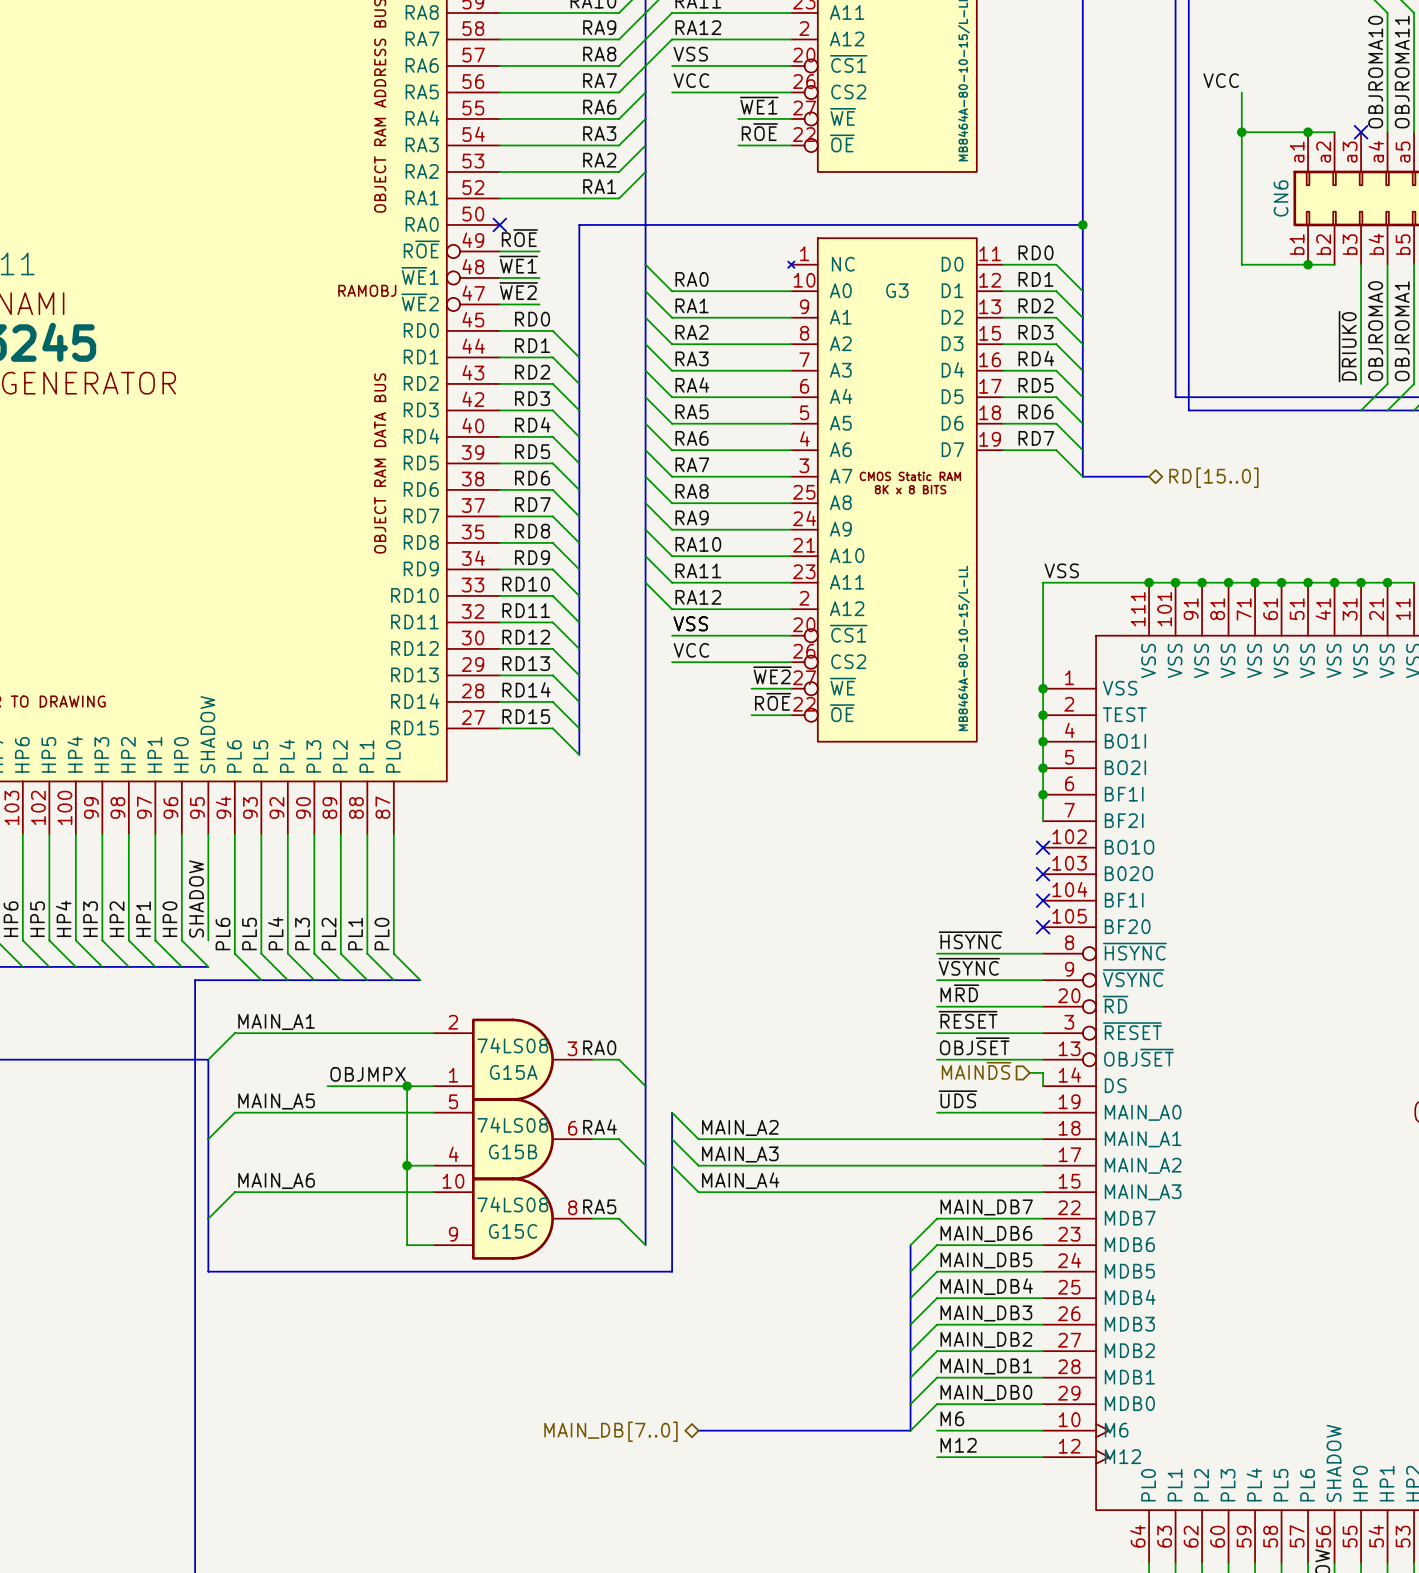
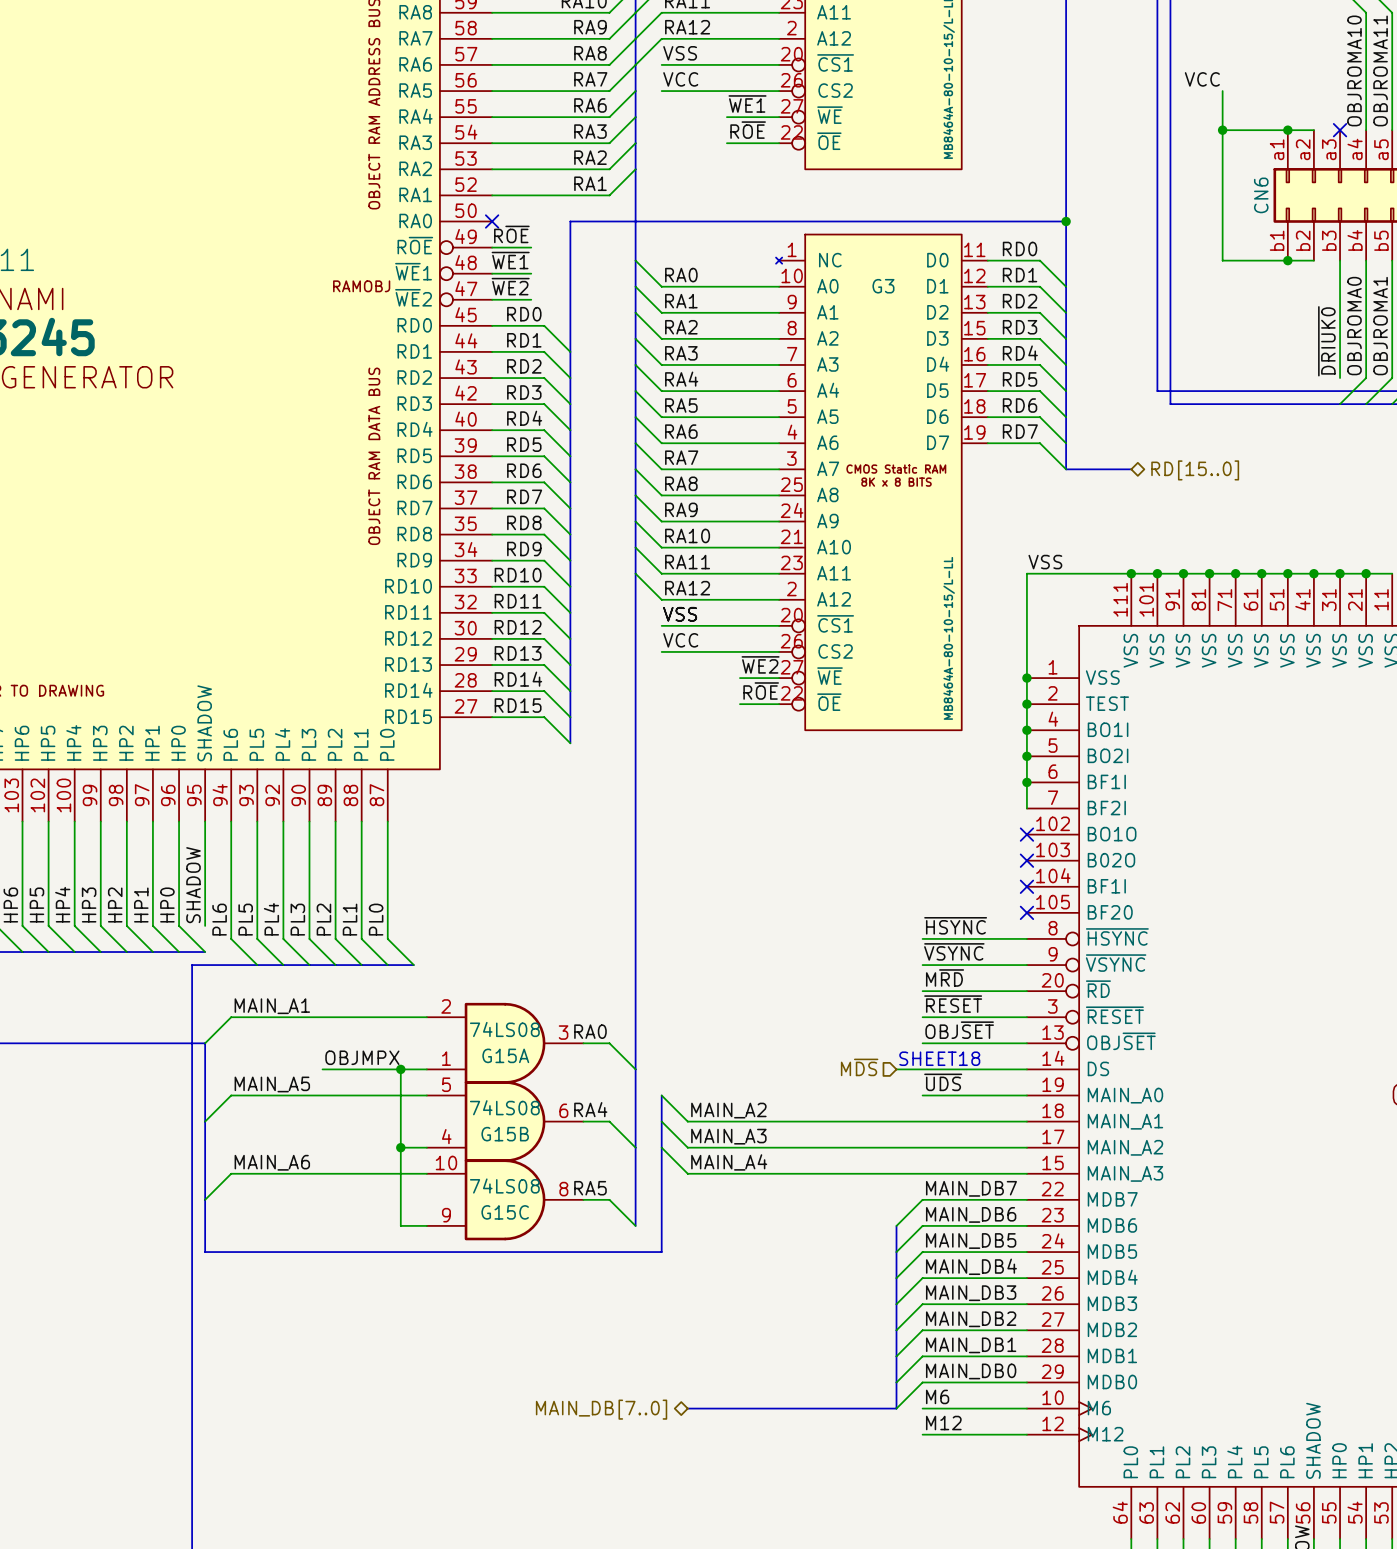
hierarchical label: MAIN~{DS} (976, 1070) -> M~{DS} (859, 1067)
wire: (1029, 1072) (1043, 1072) (1043, 1086) -> (896, 1069) (1026, 1069)
text: none -> SHEET18 (939, 1058)

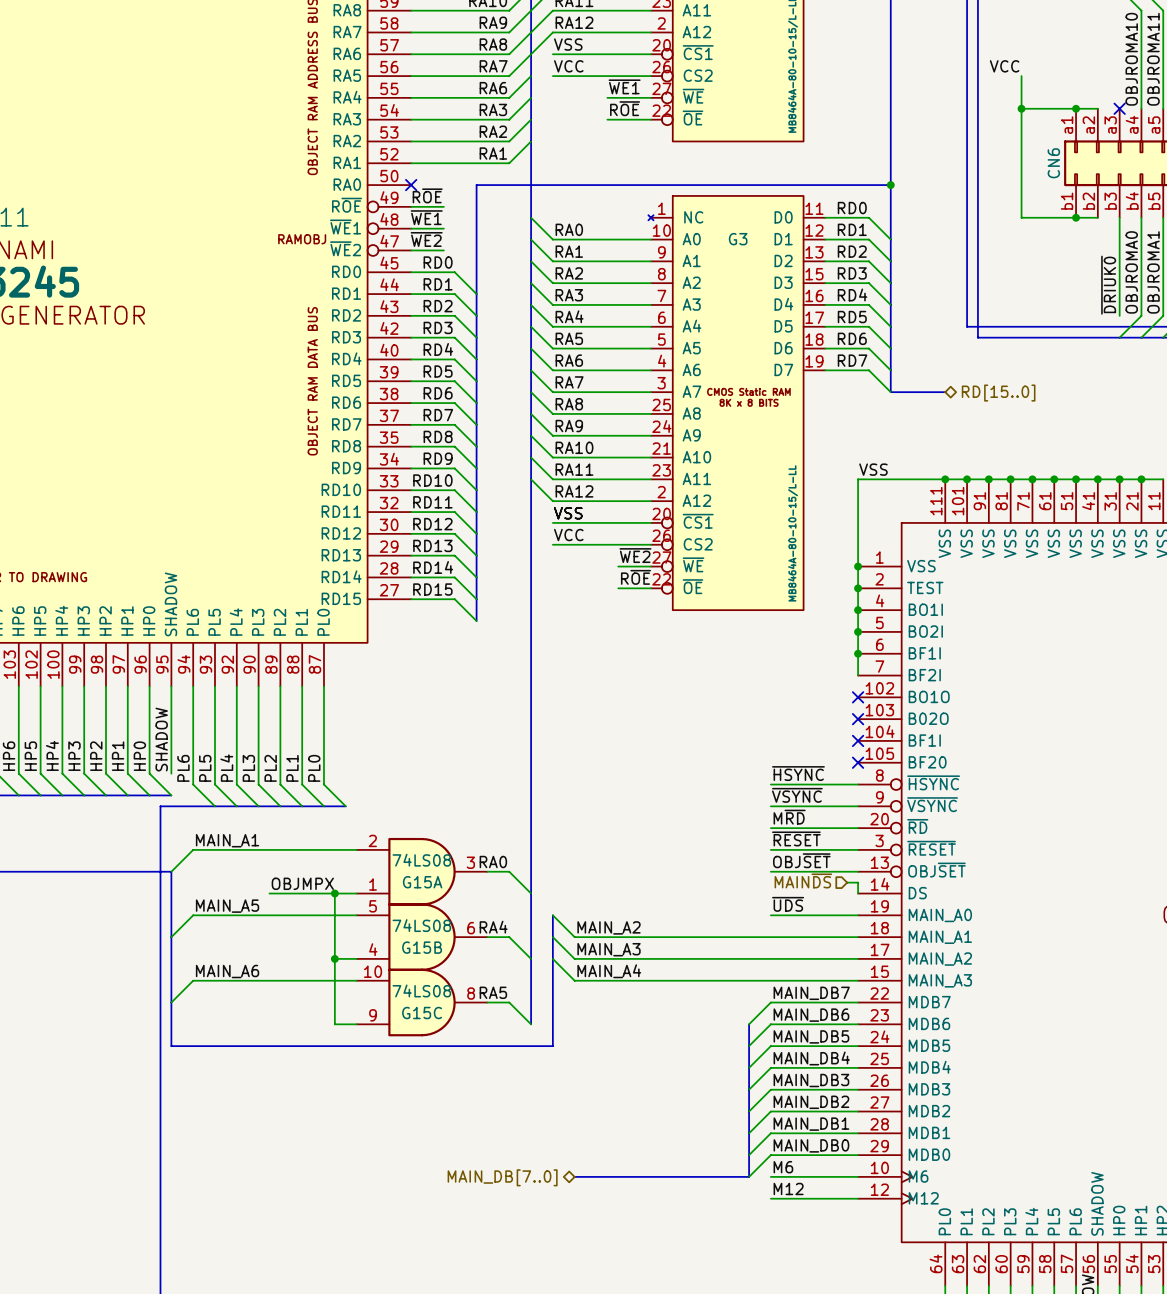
text: SHEET18 (939, 1058) -> none
hierarchical label: M~{DS} (859, 1067) -> MAIN~{DS} (803, 880)
wire: (896, 1069) (1026, 1069) -> (847, 882) (858, 882) (858, 893)

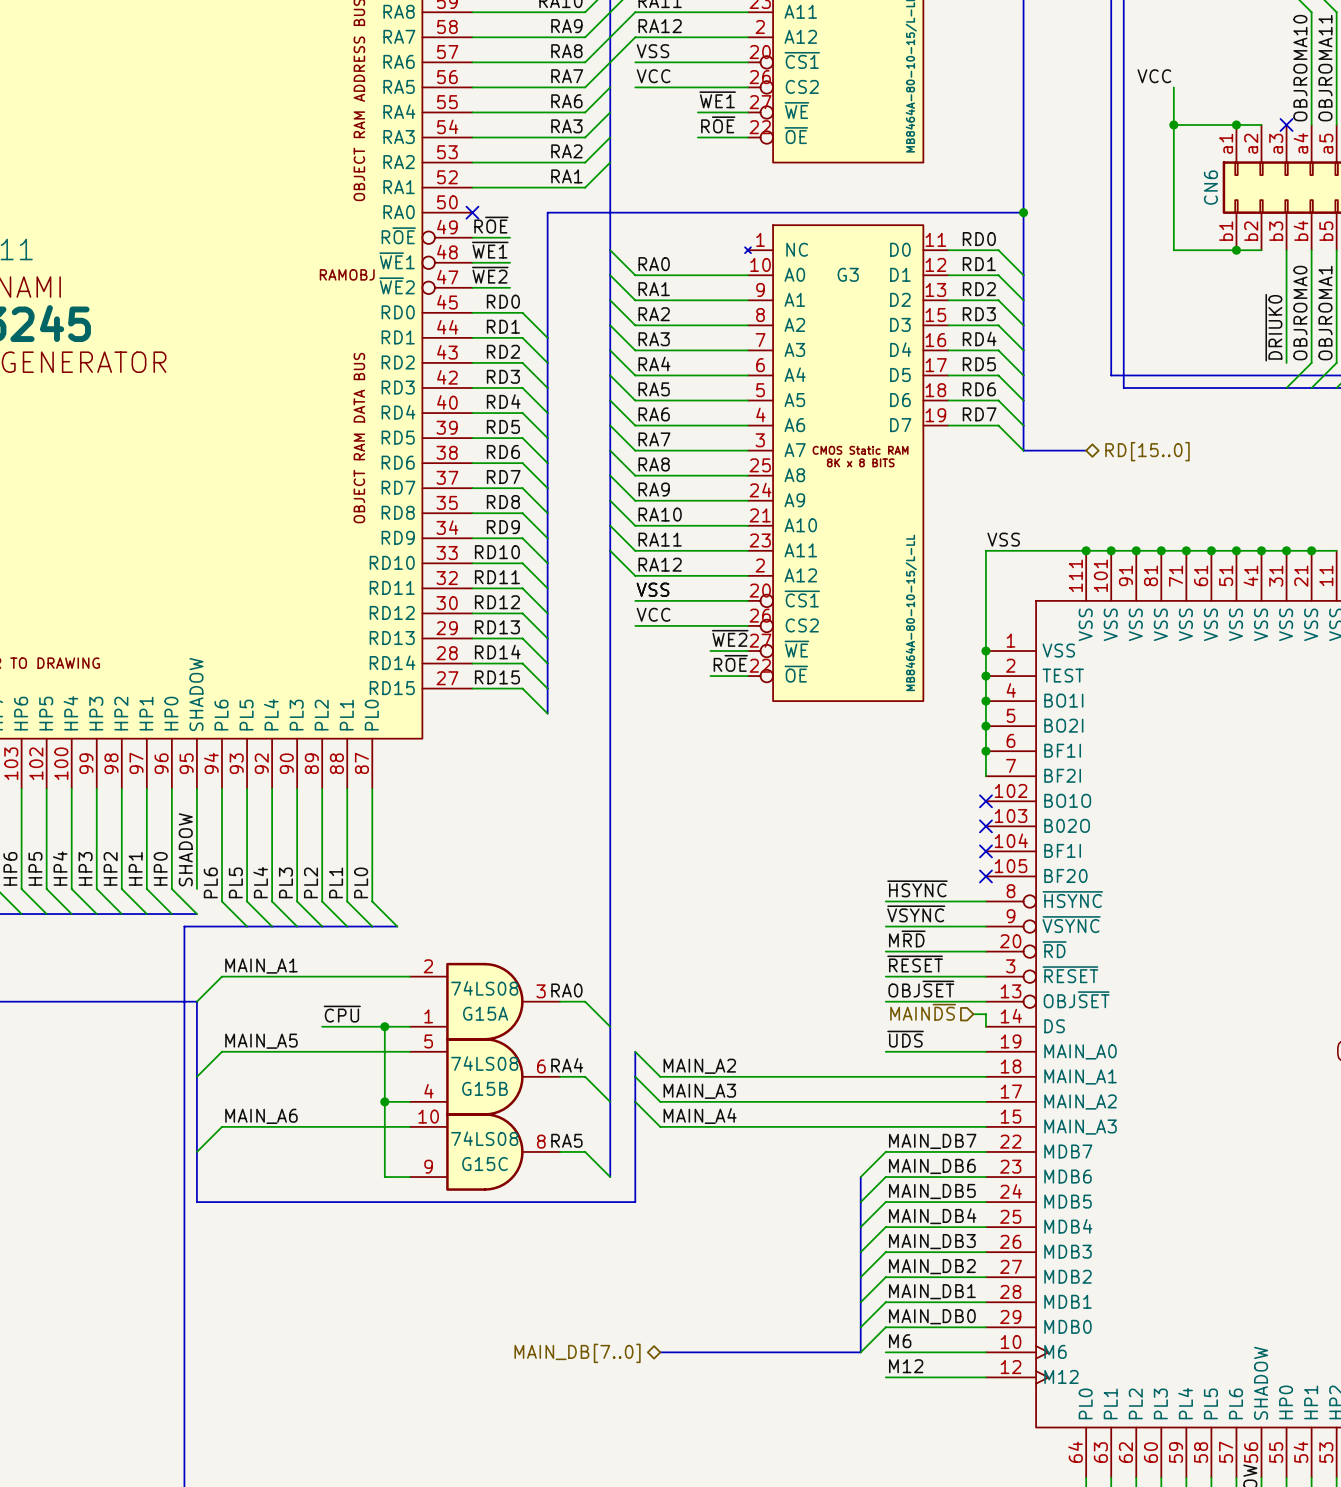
label: none -> ~{CPU} (342, 1014)
label: OBJMPX (302, 883) -> none
wire: (269, 893) (280, 893) -> none

